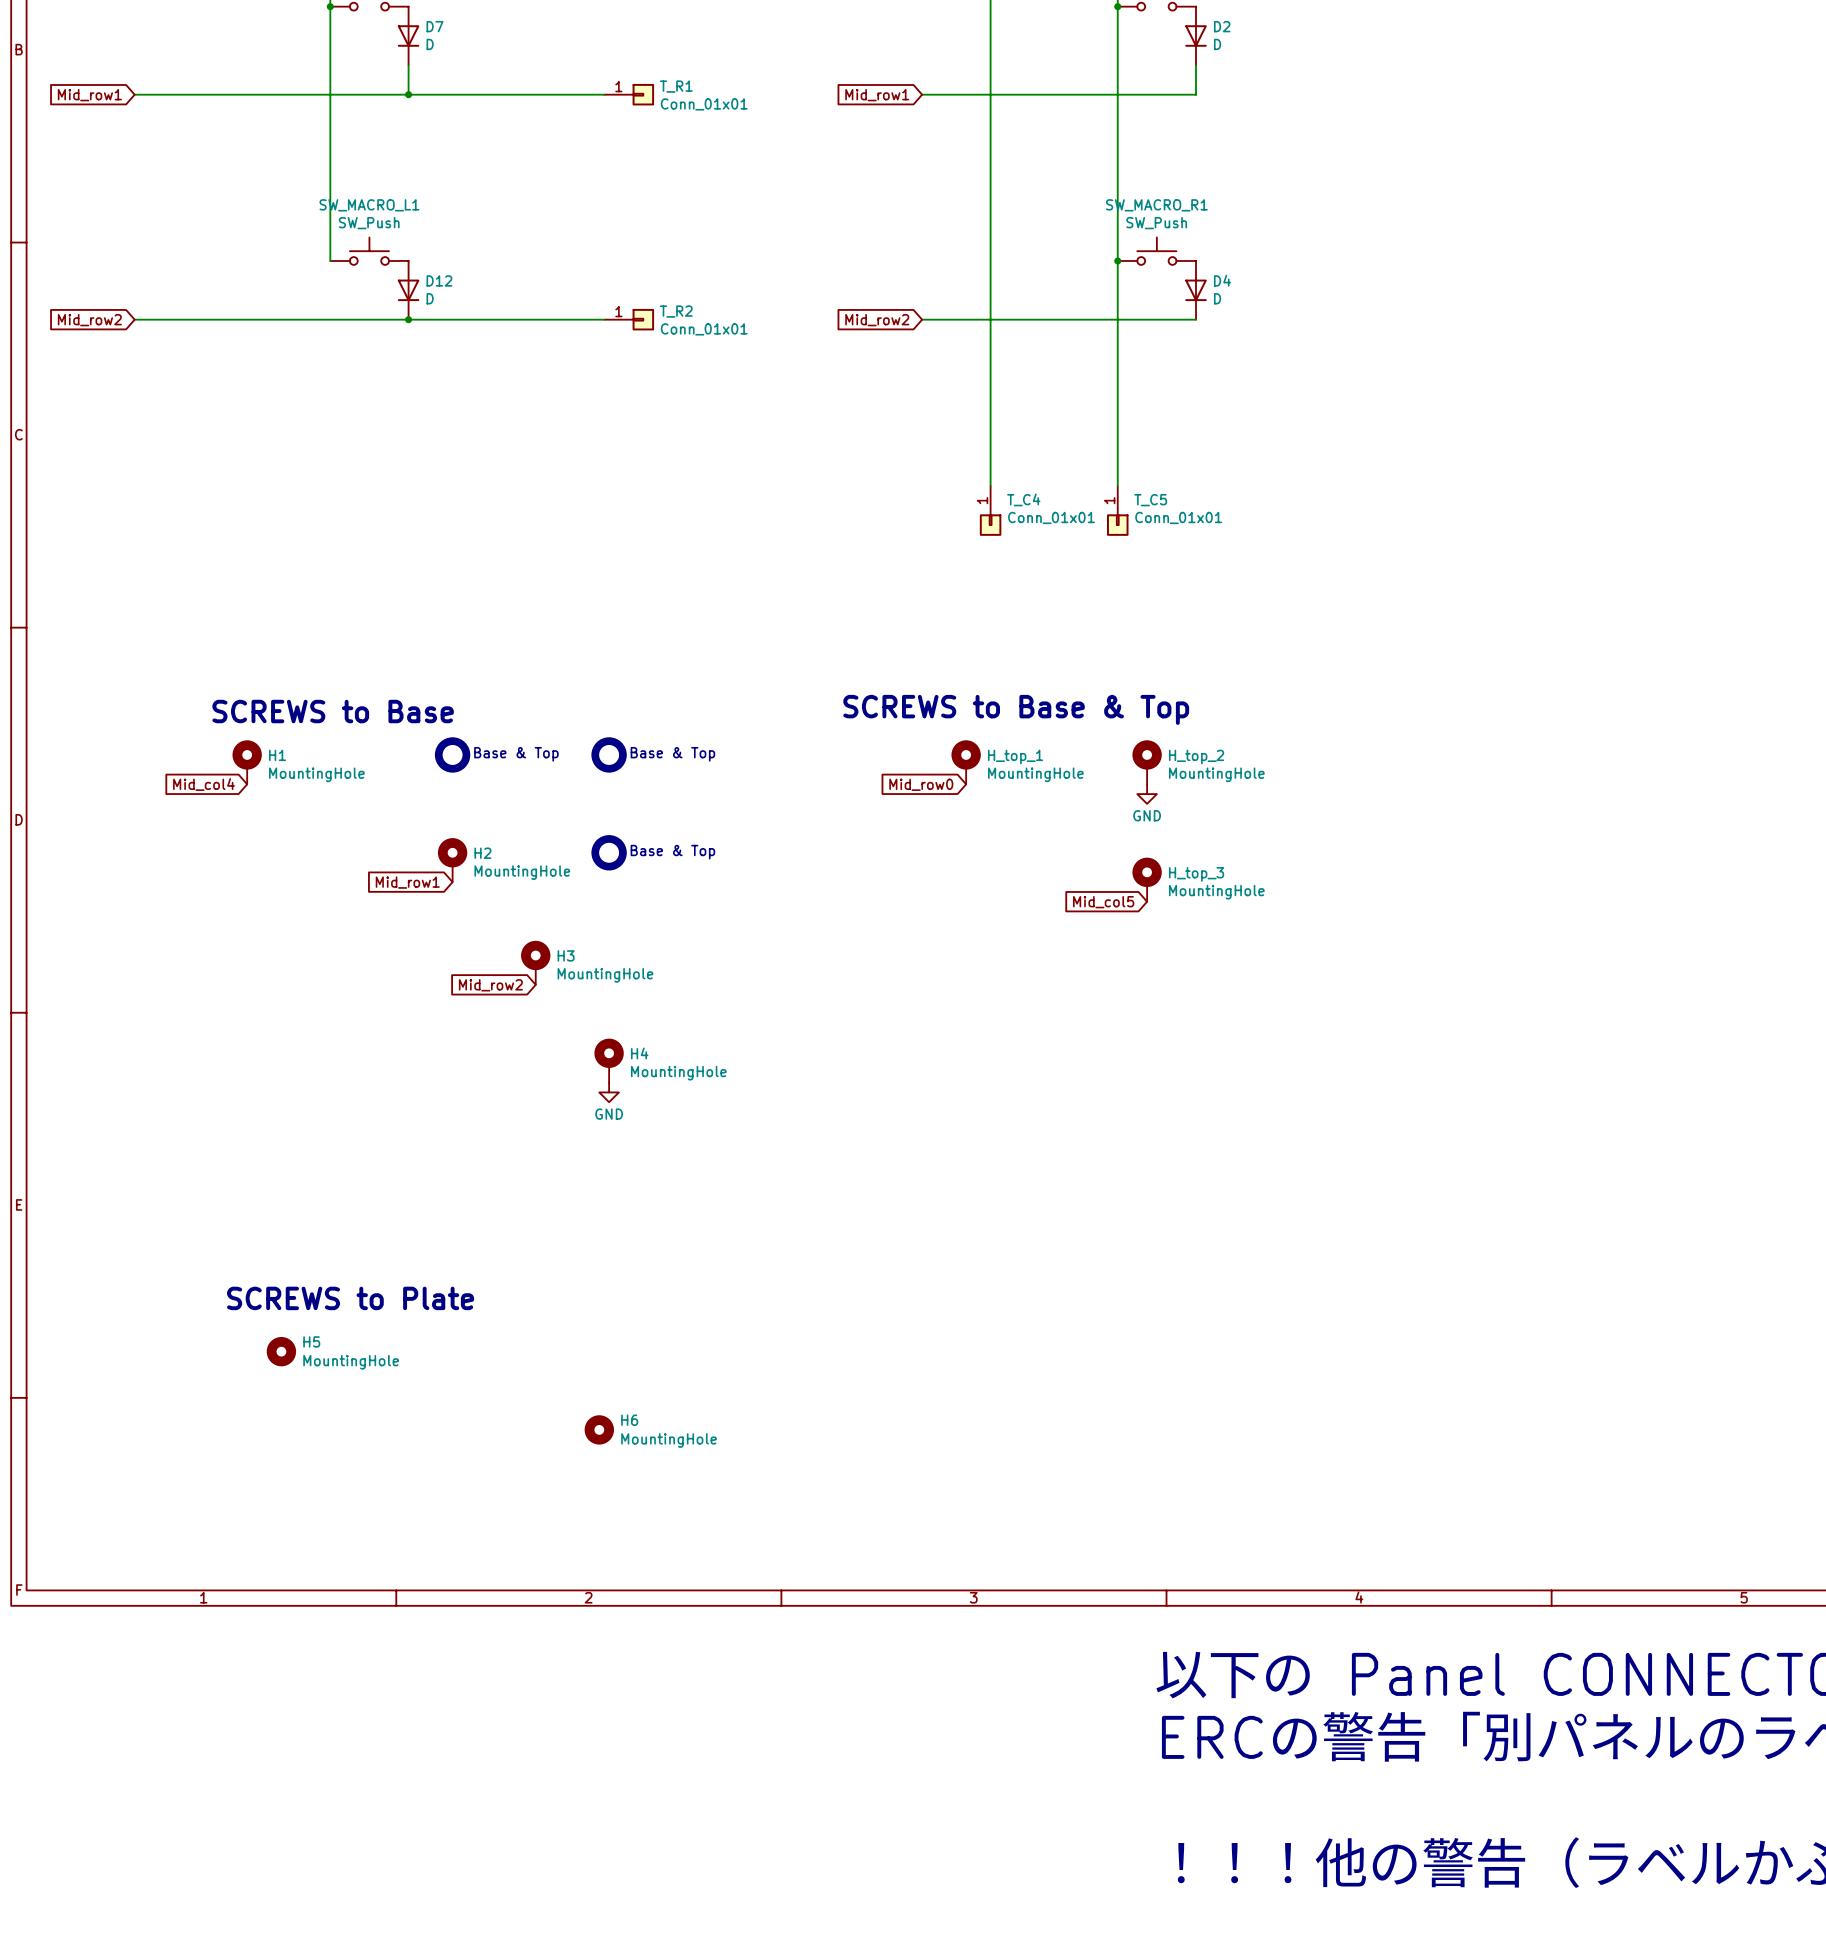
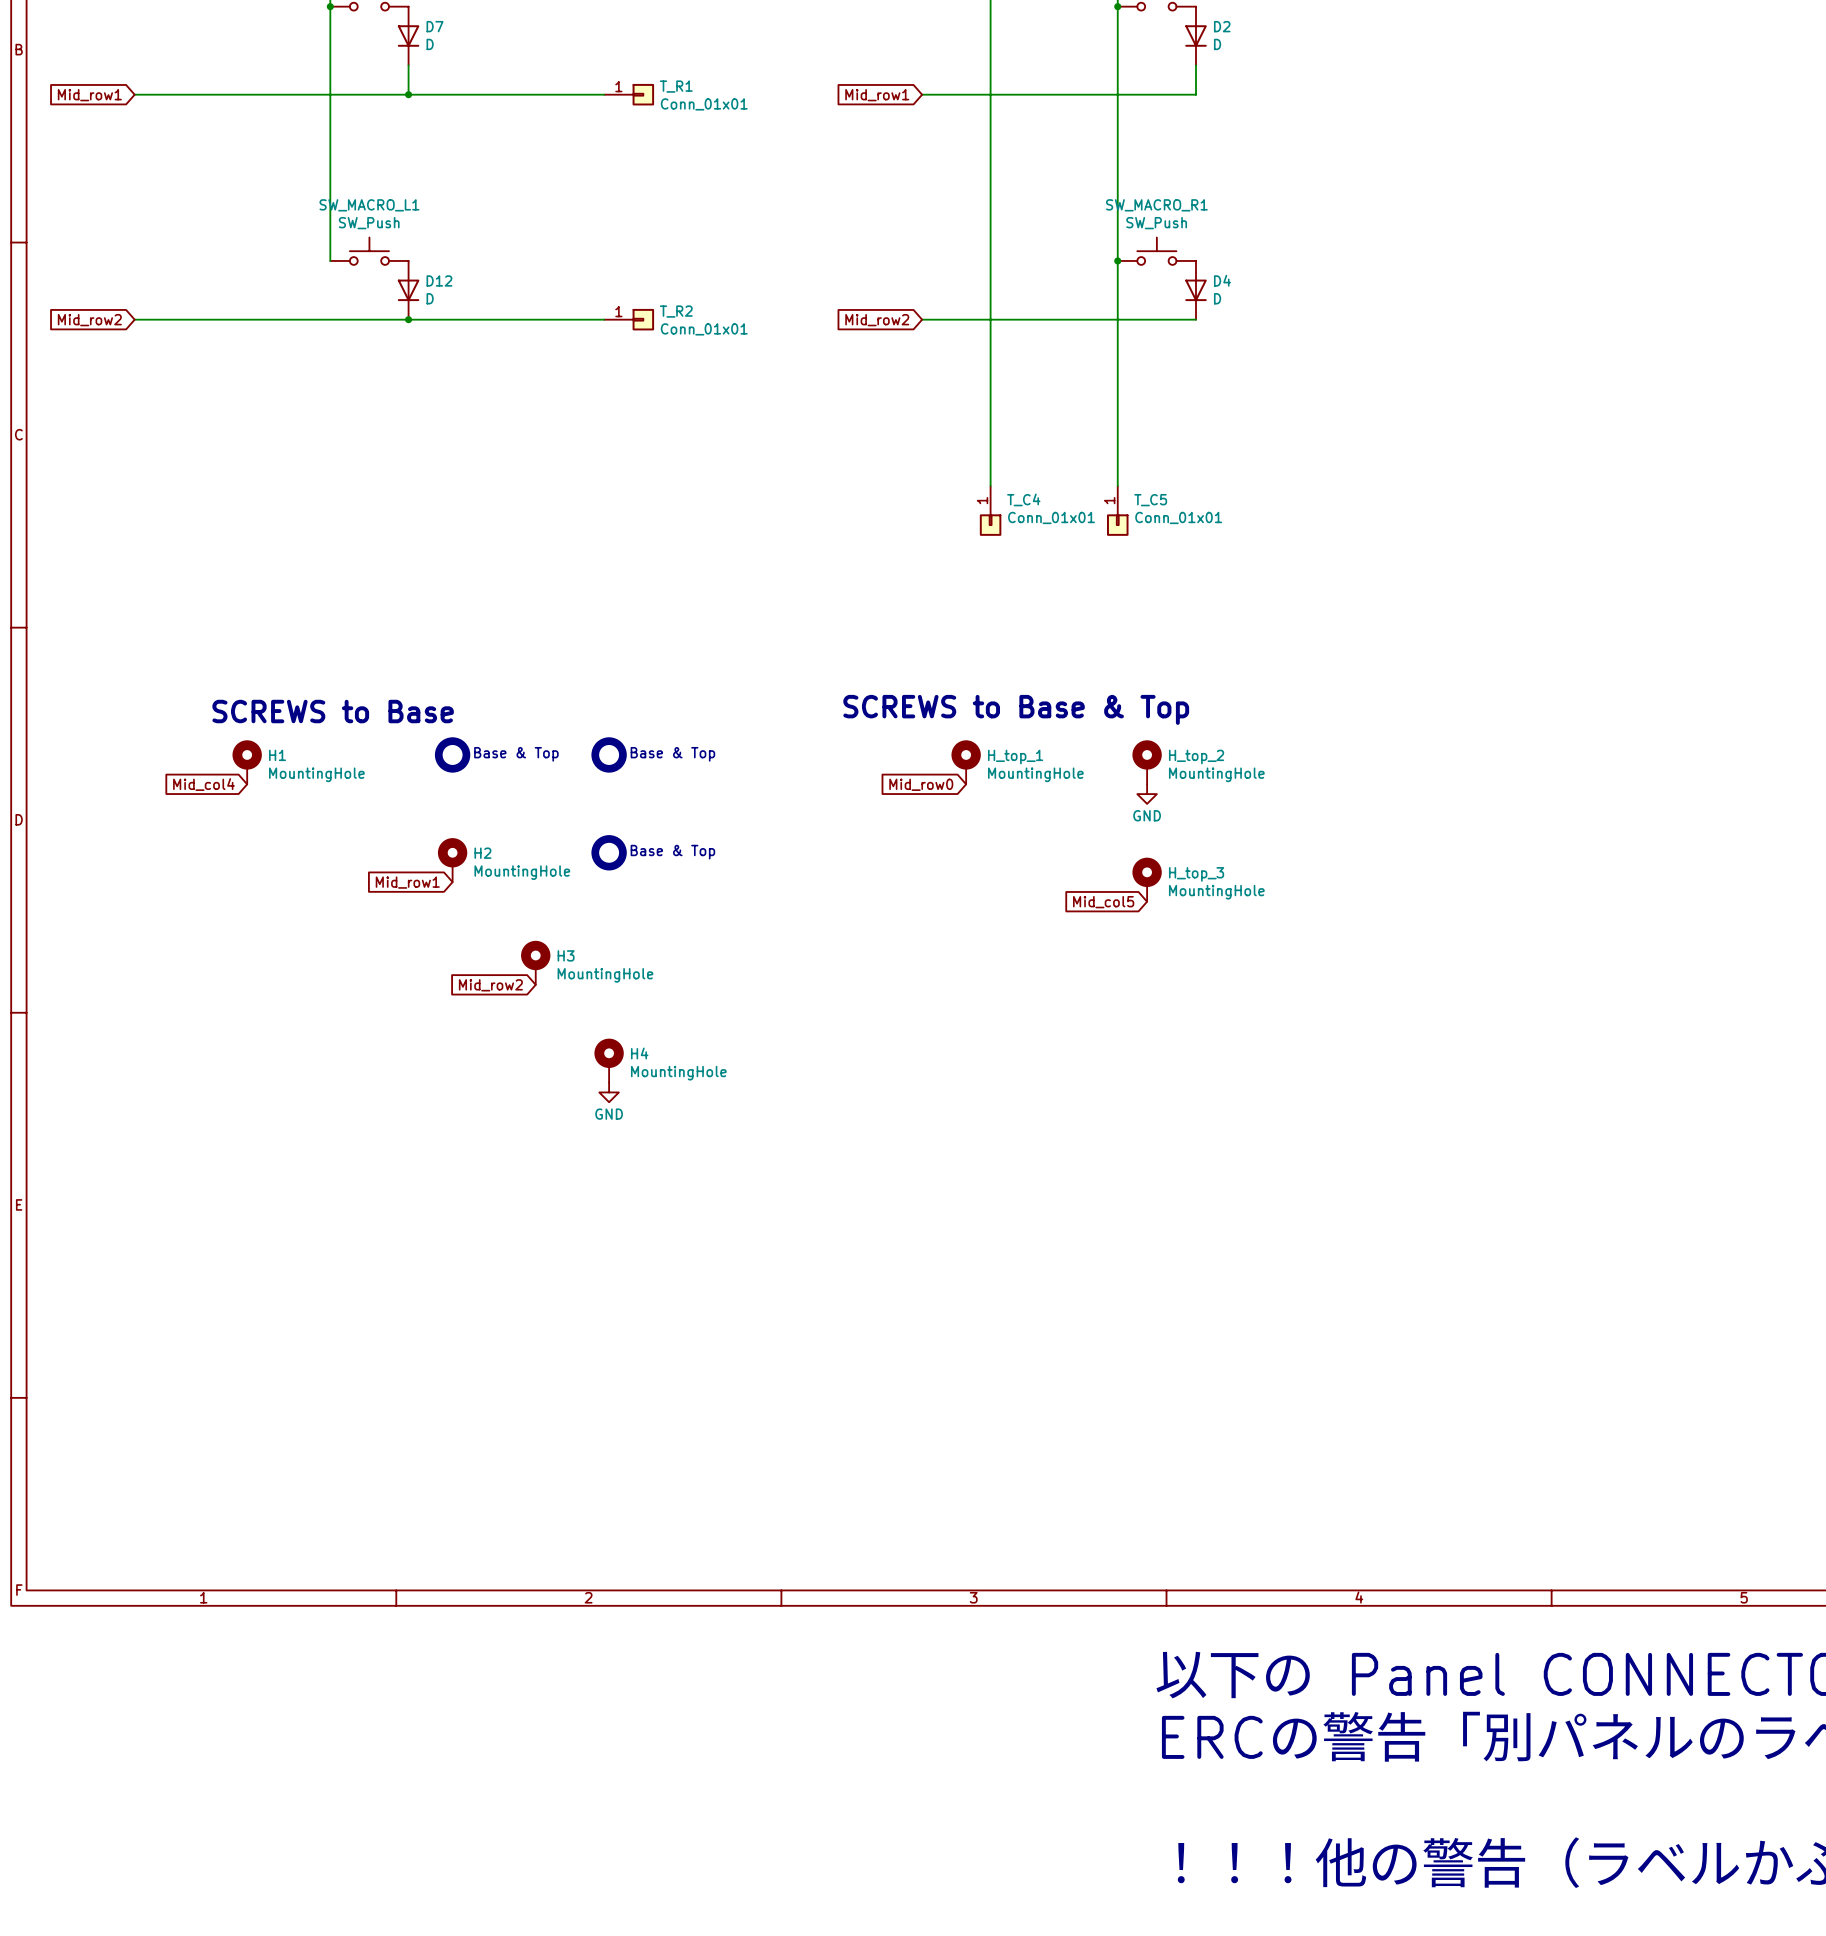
text: SCREWS to Plate (350, 1298) -> none
H5: MountingHole (281, 1351) -> none
H6: MountingHole (599, 1429) -> none

